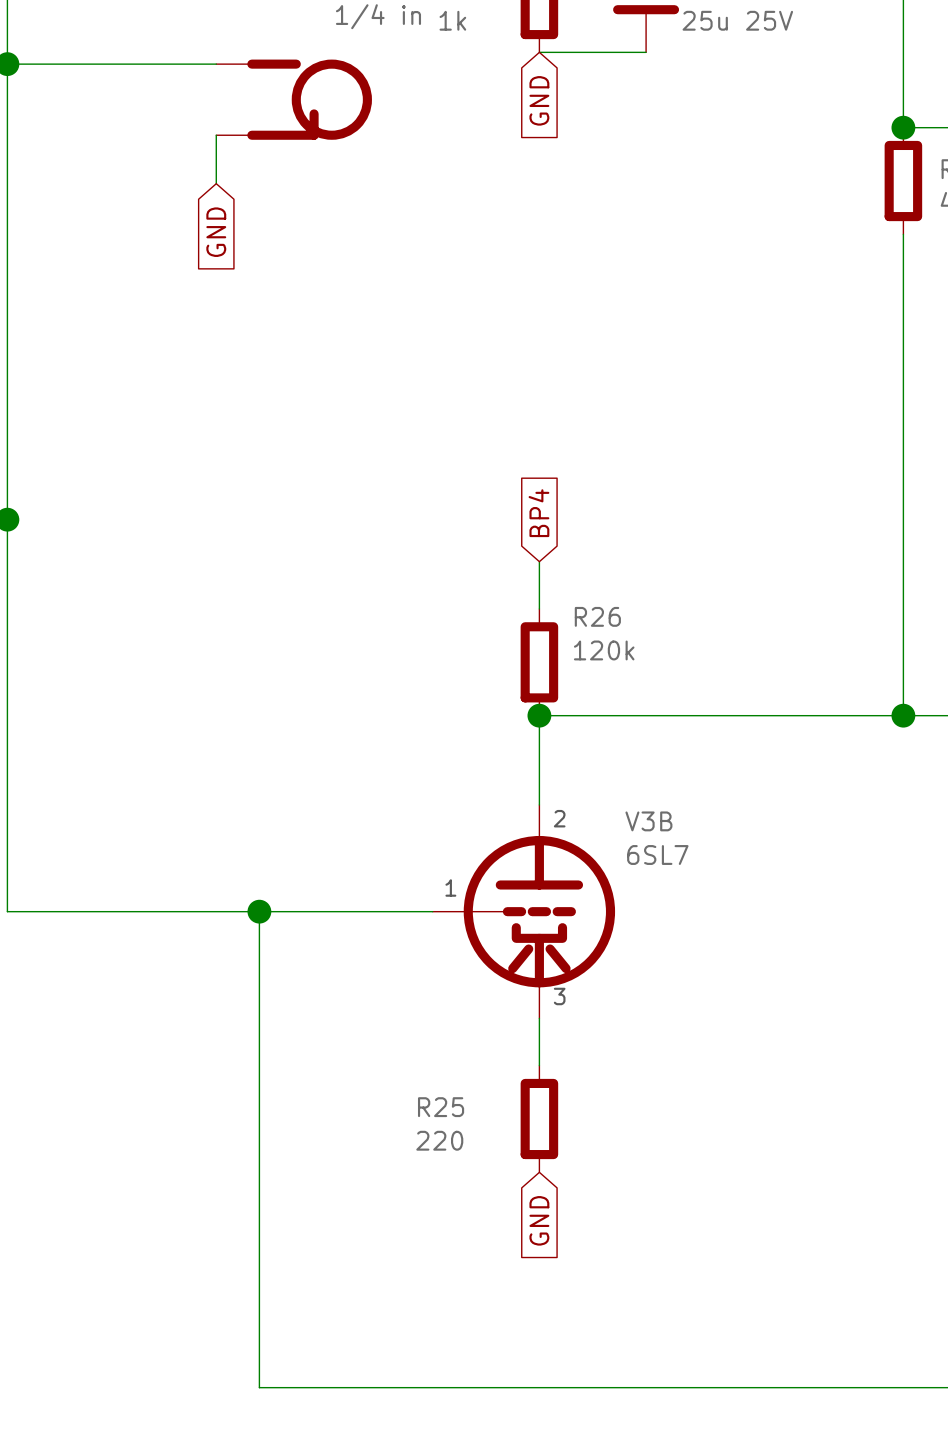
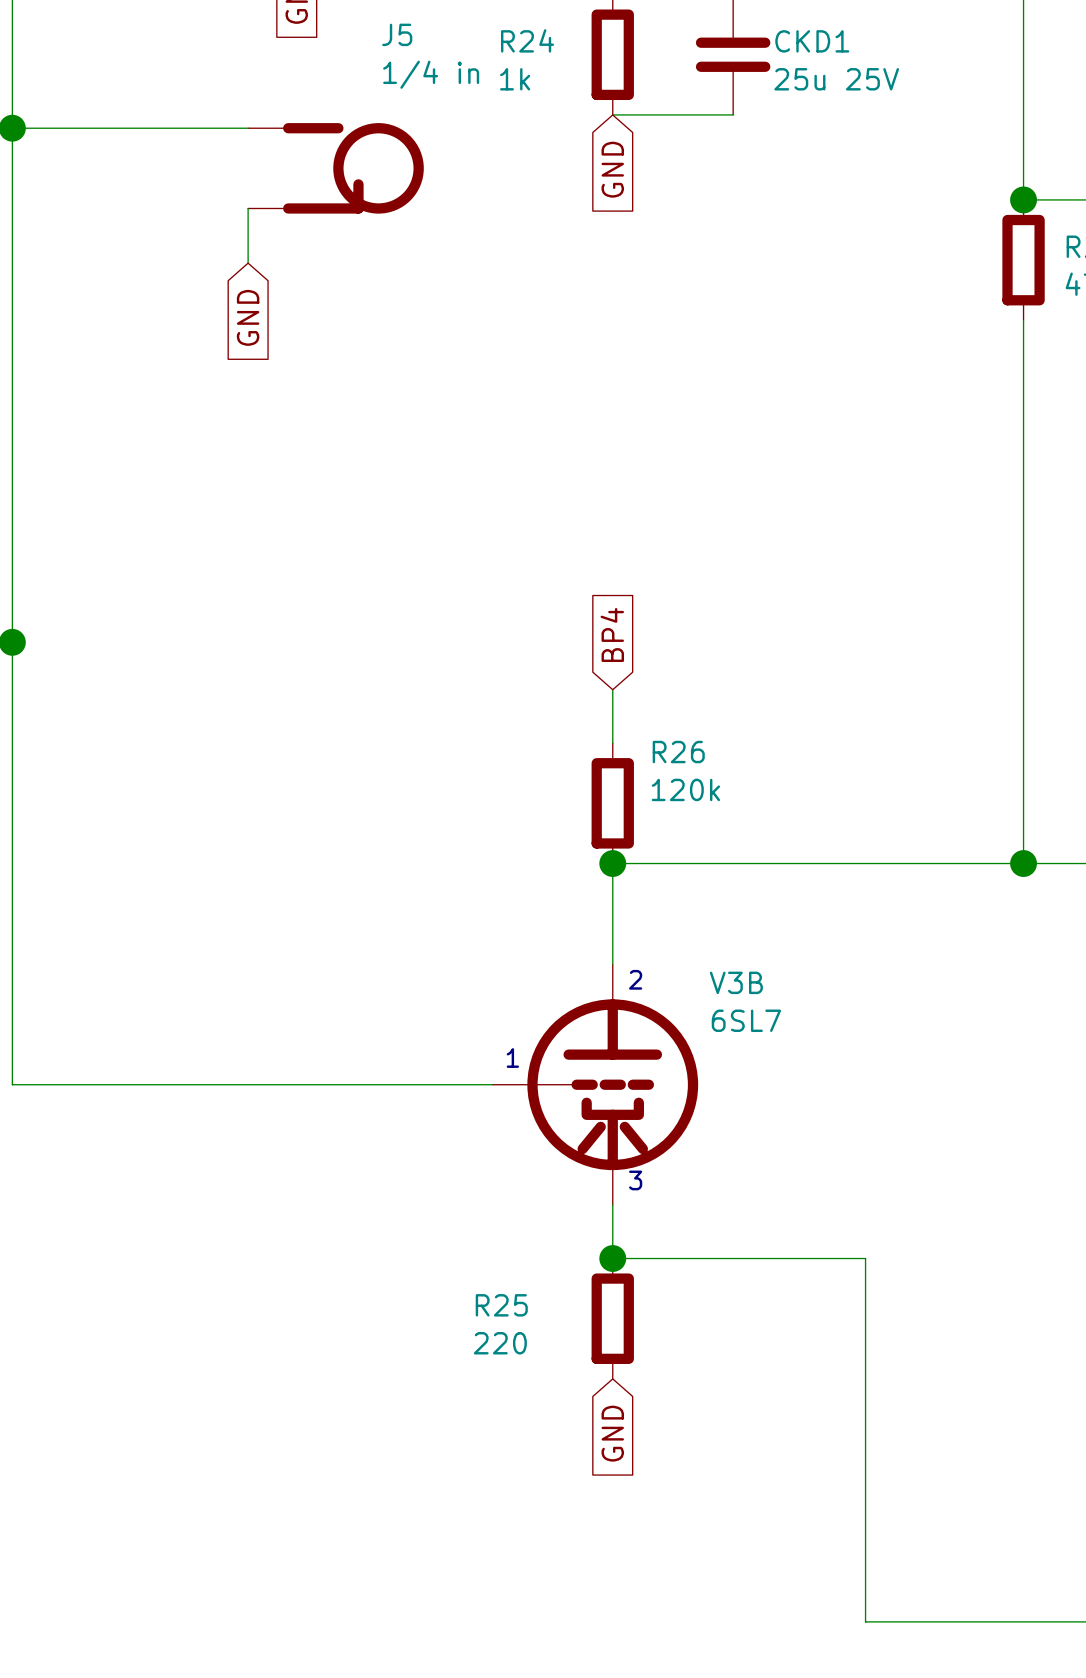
wire: (259, 911) (259, 1387) (763, 1387) -> (612, 1258) (865, 1258) (865, 1621)
junction: (259, 911) -> none
junction: none -> (612, 1258)

